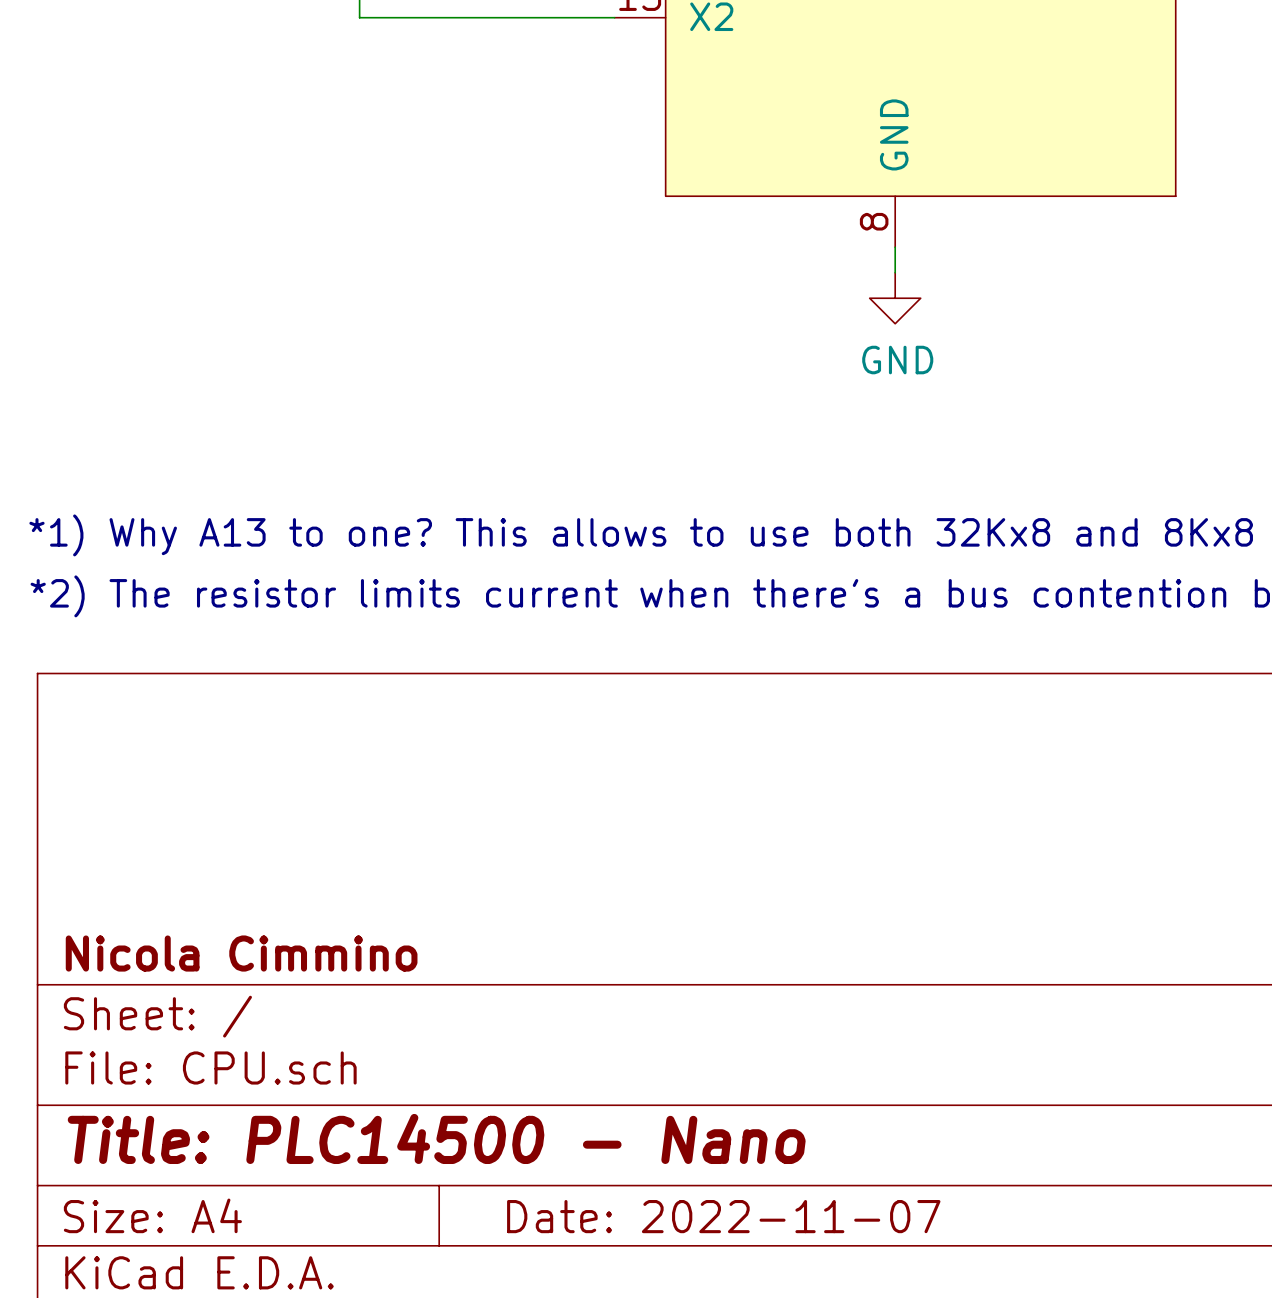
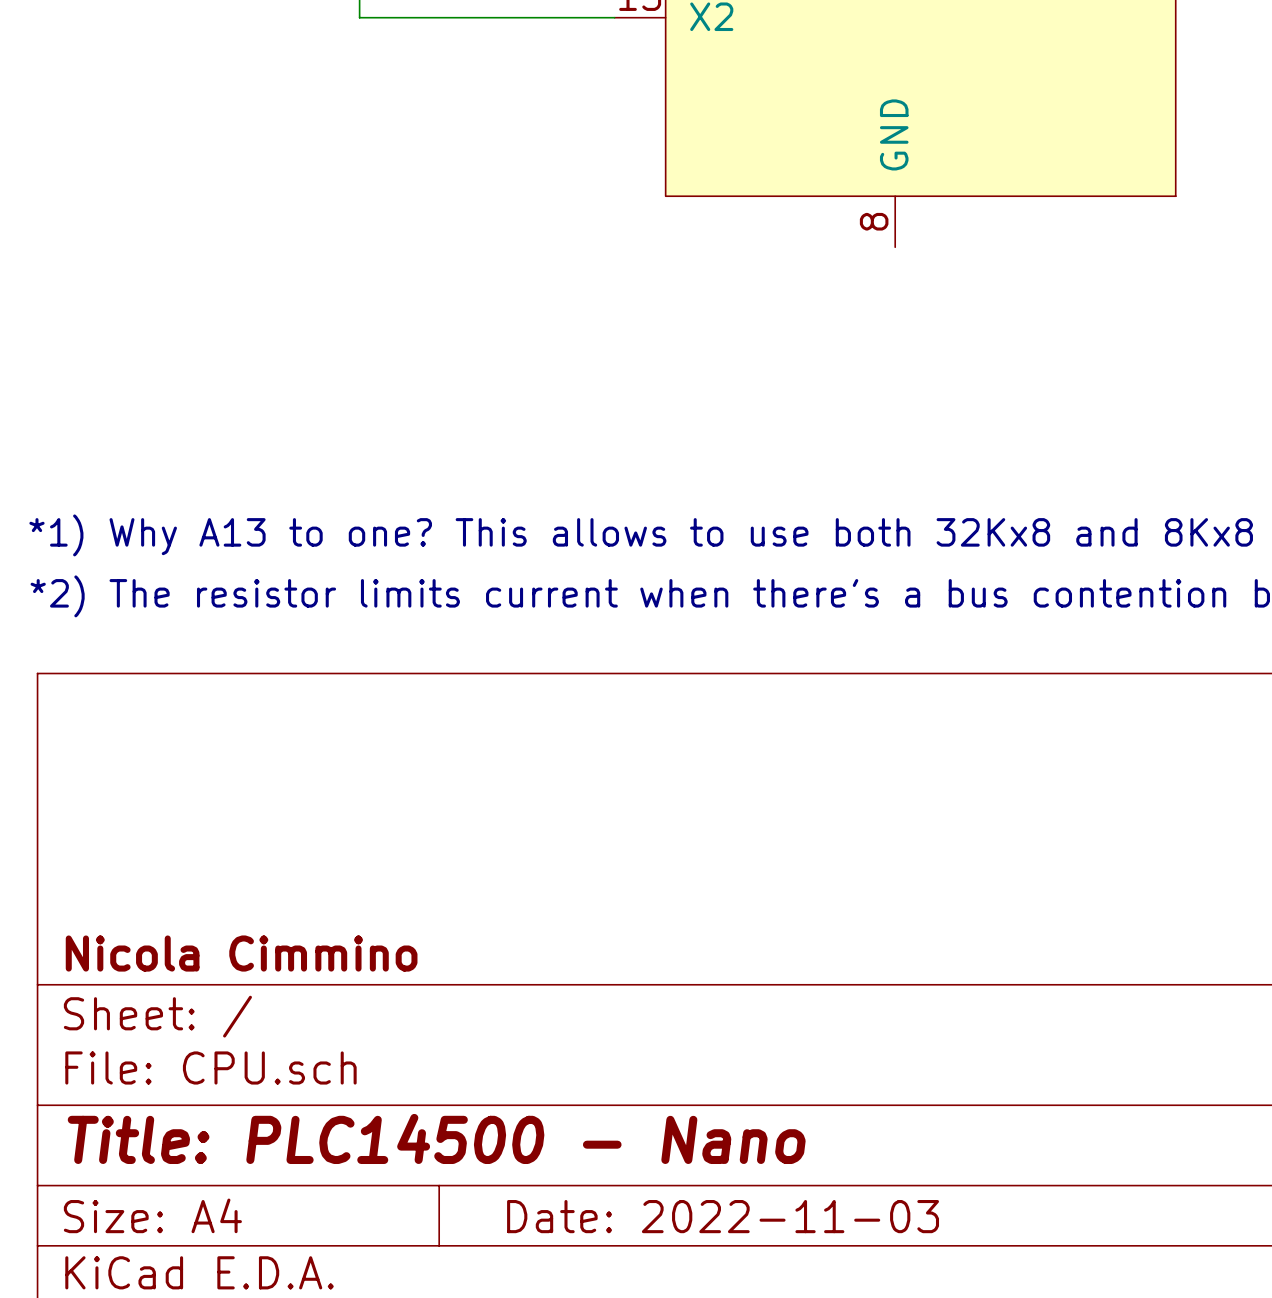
wire: (895, 247) (895, 272) -> none
power symbol: GND (895, 298) -> none
title block: Date: 2022-11-07 (723, 1216) -> Date: 2022-11-03 (723, 1216)

